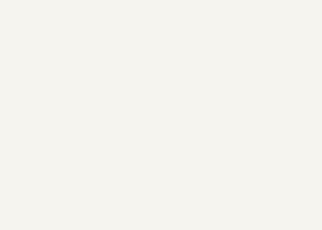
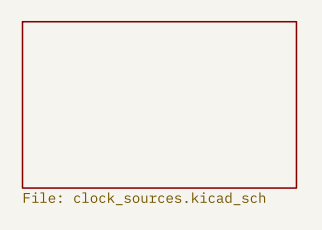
sheet: none -> File: clock_sources.kicad_sch (159, 104)

